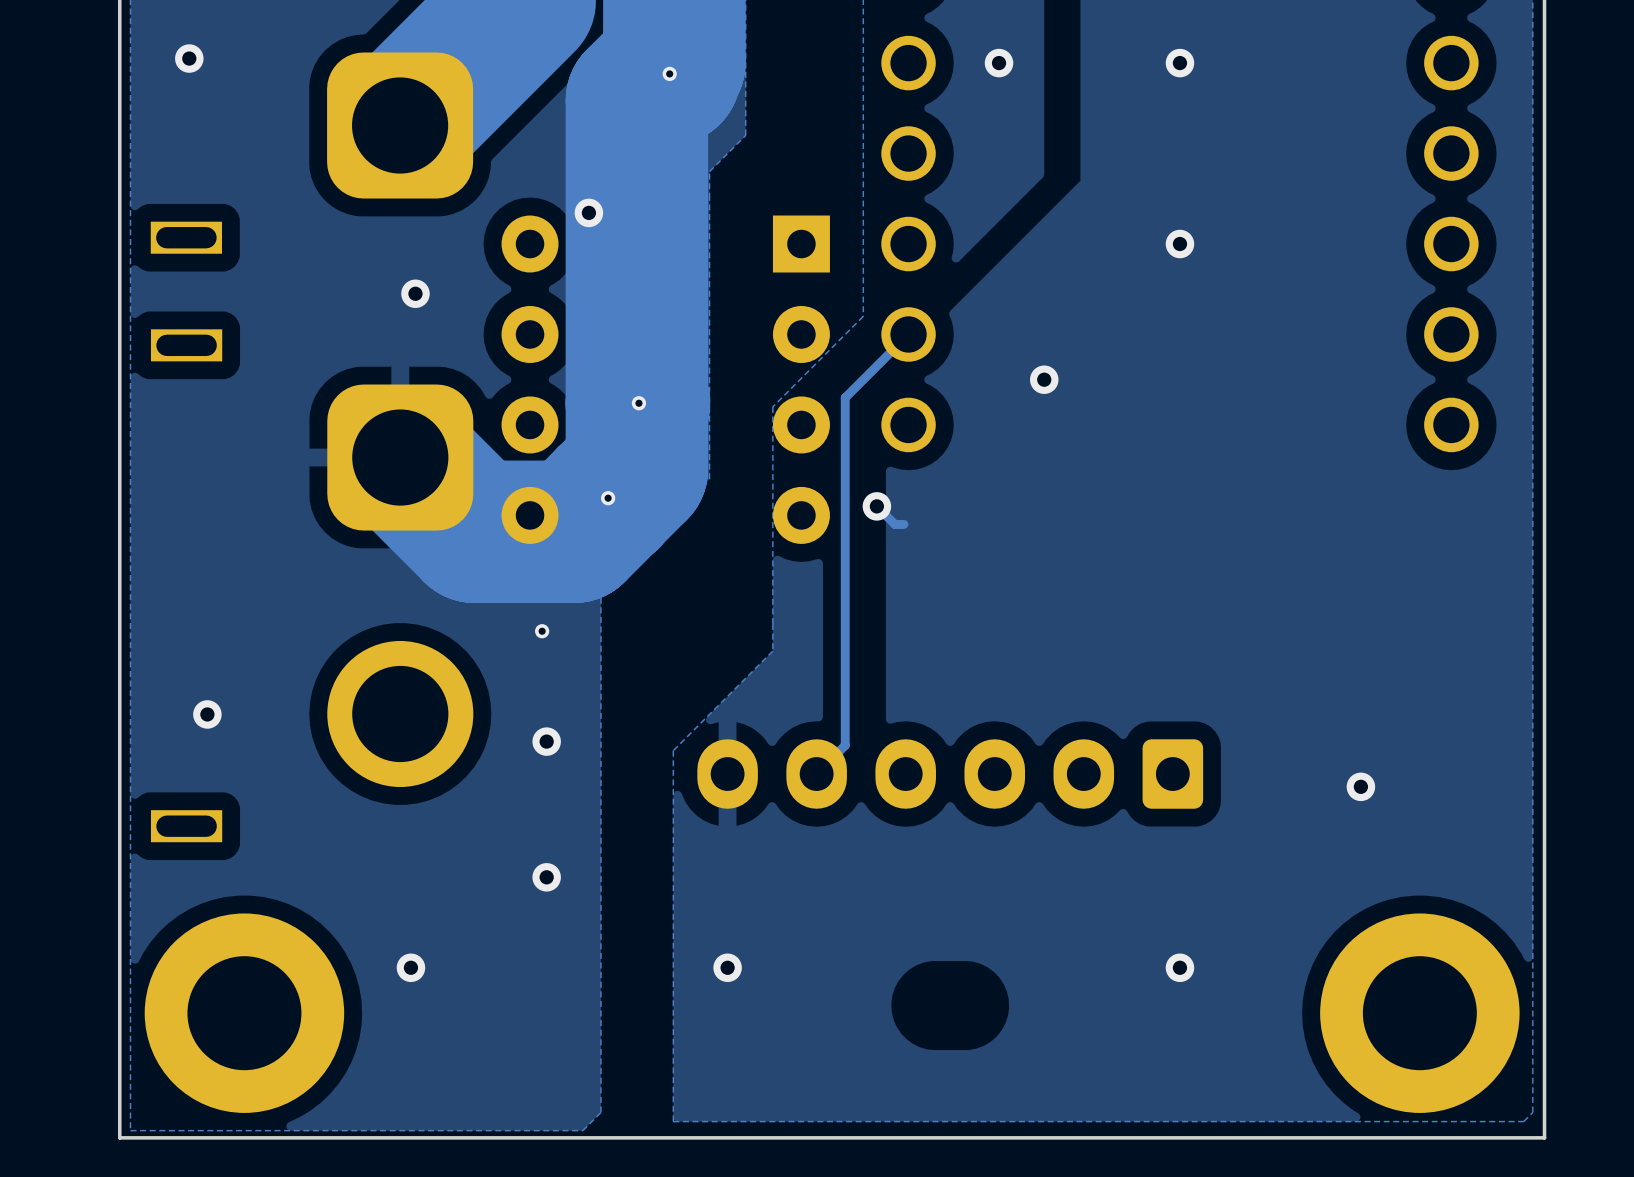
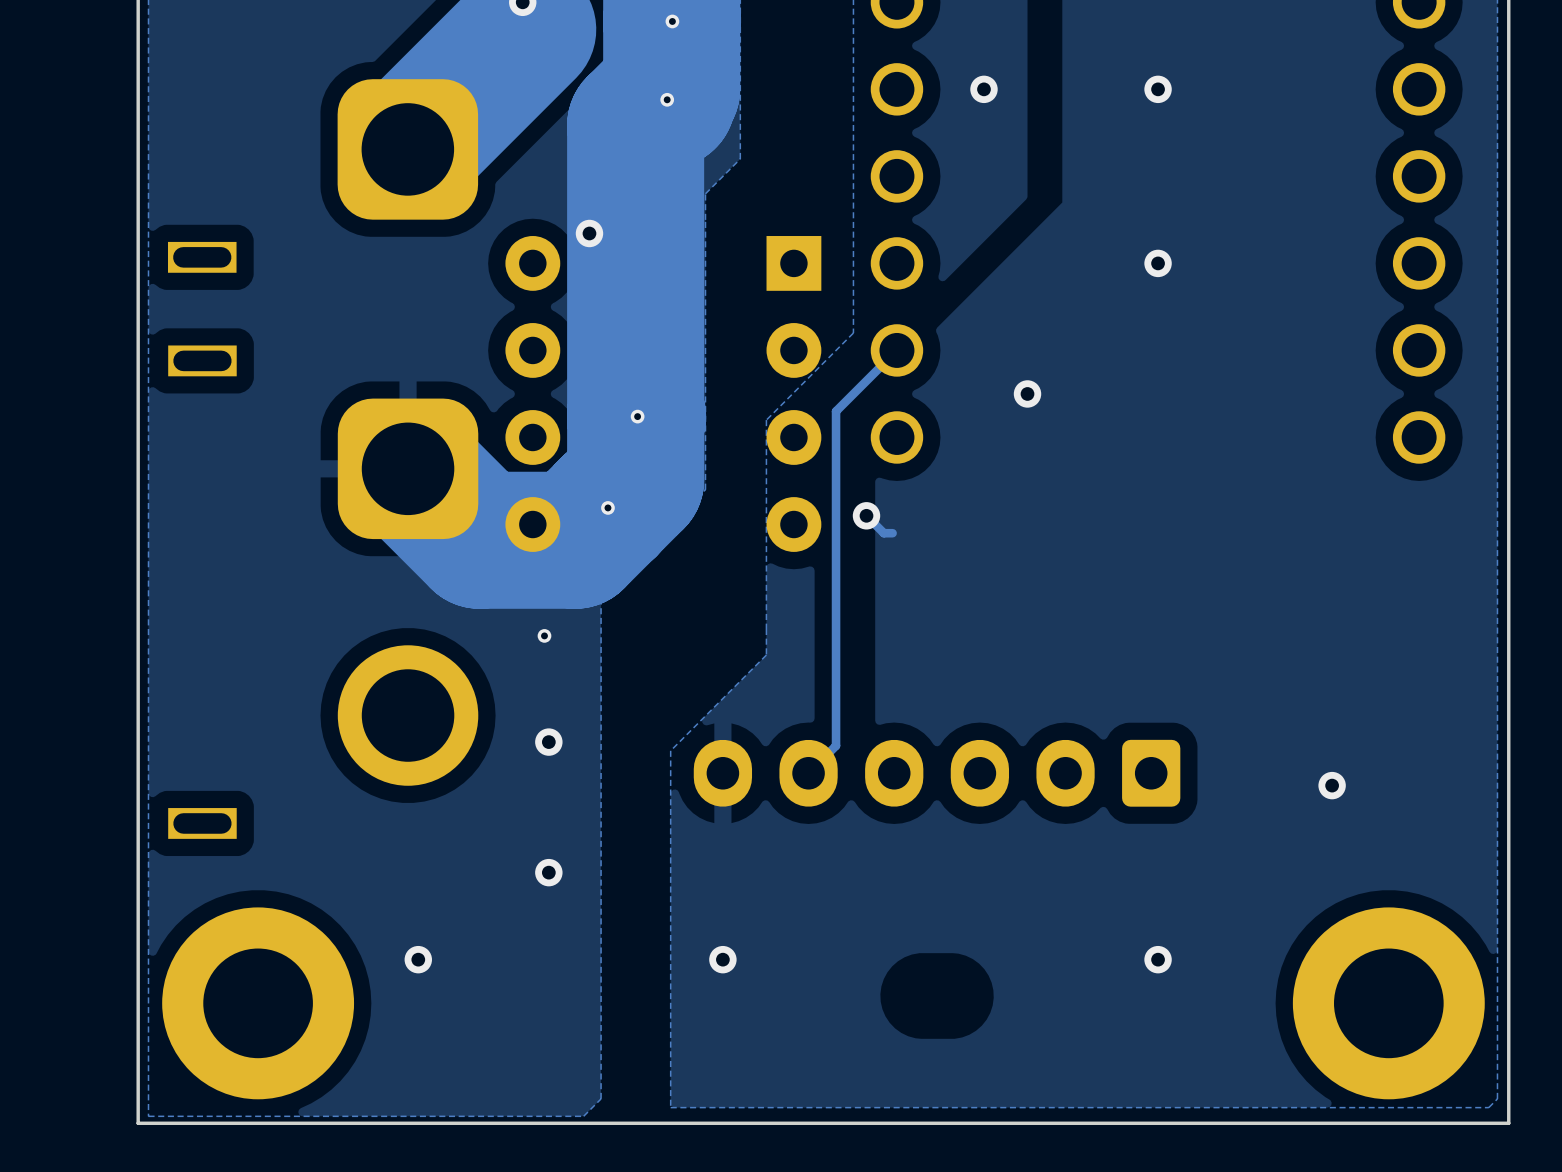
via: (189, 58) -> none
via: (415, 293) -> none
via: (207, 714) -> none

